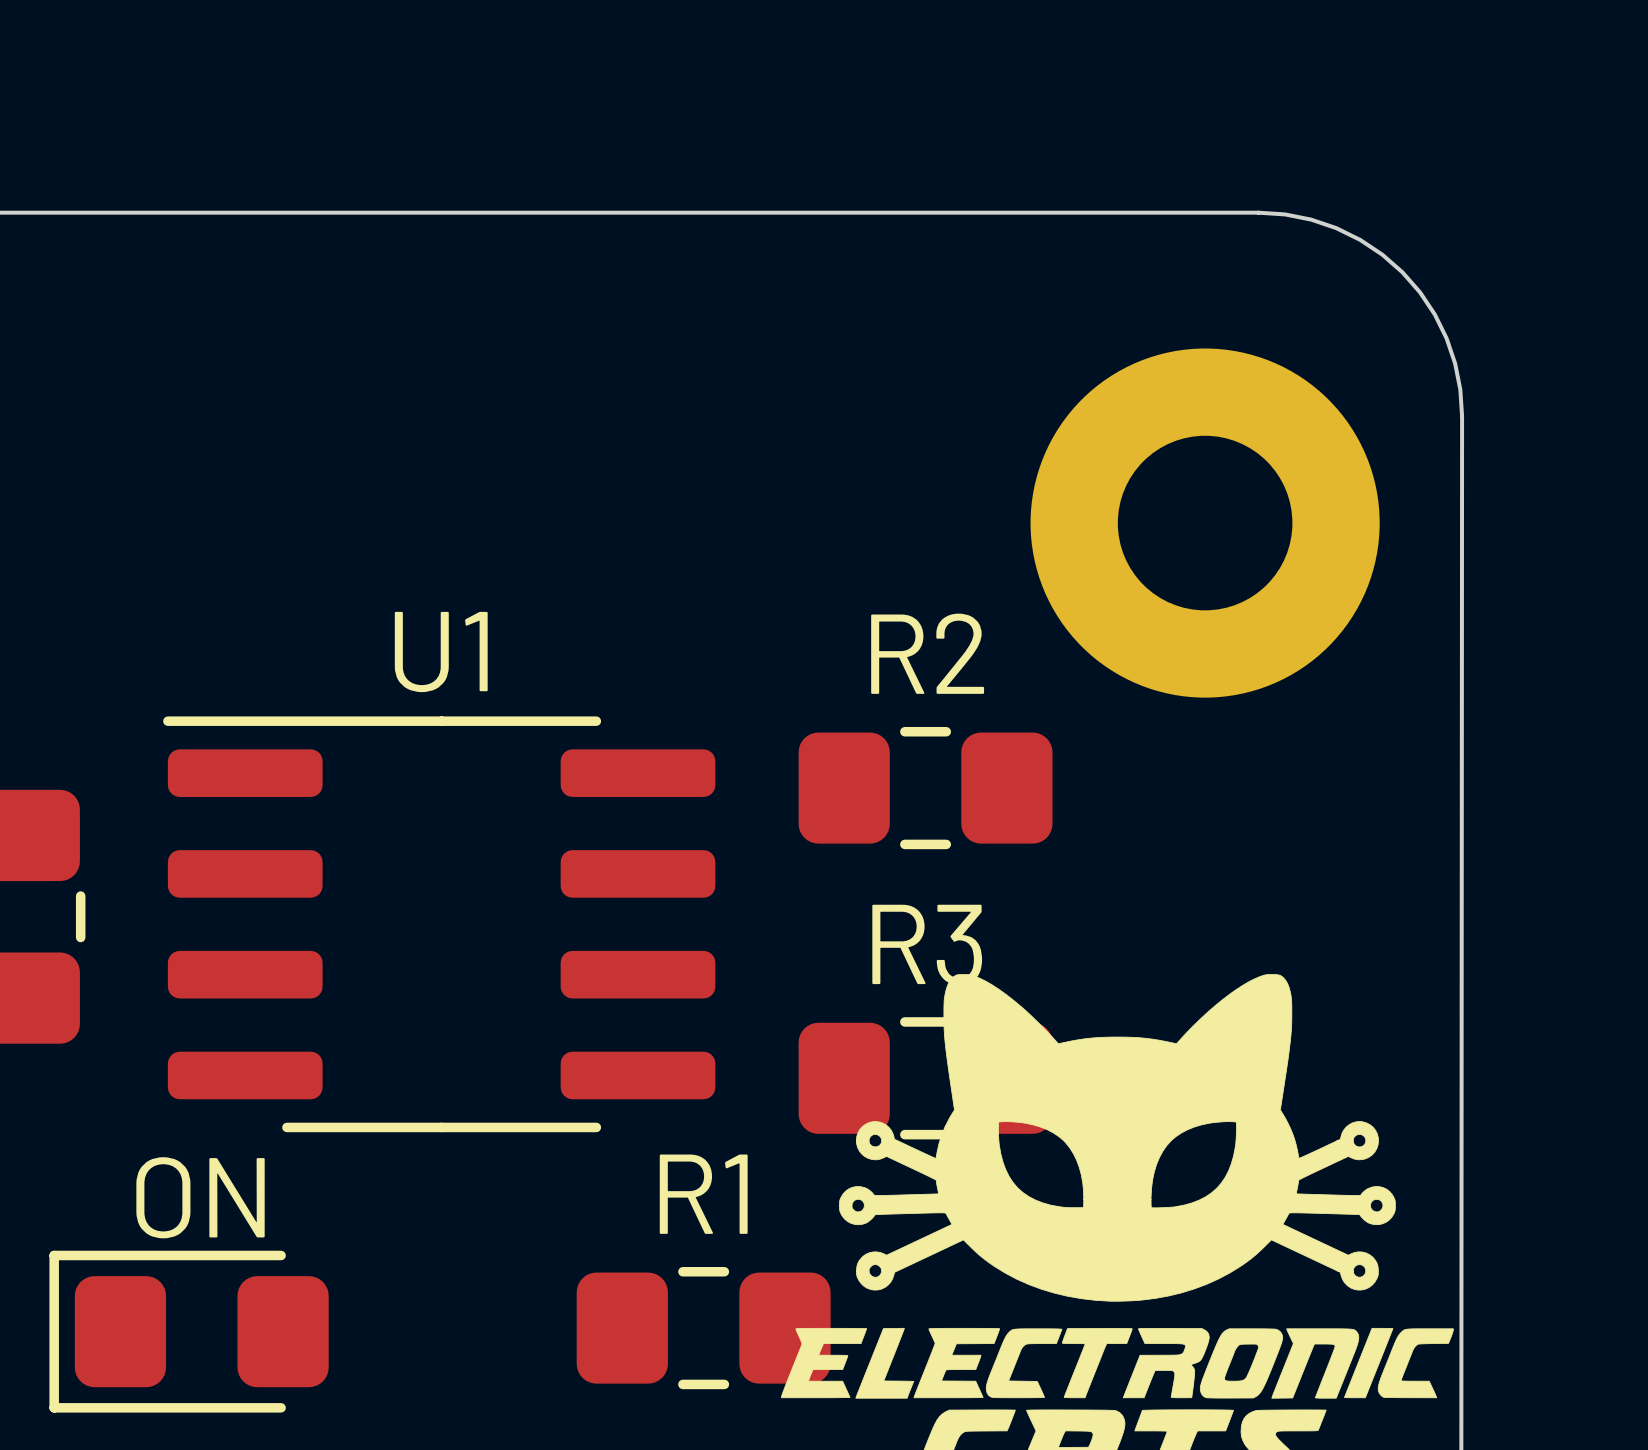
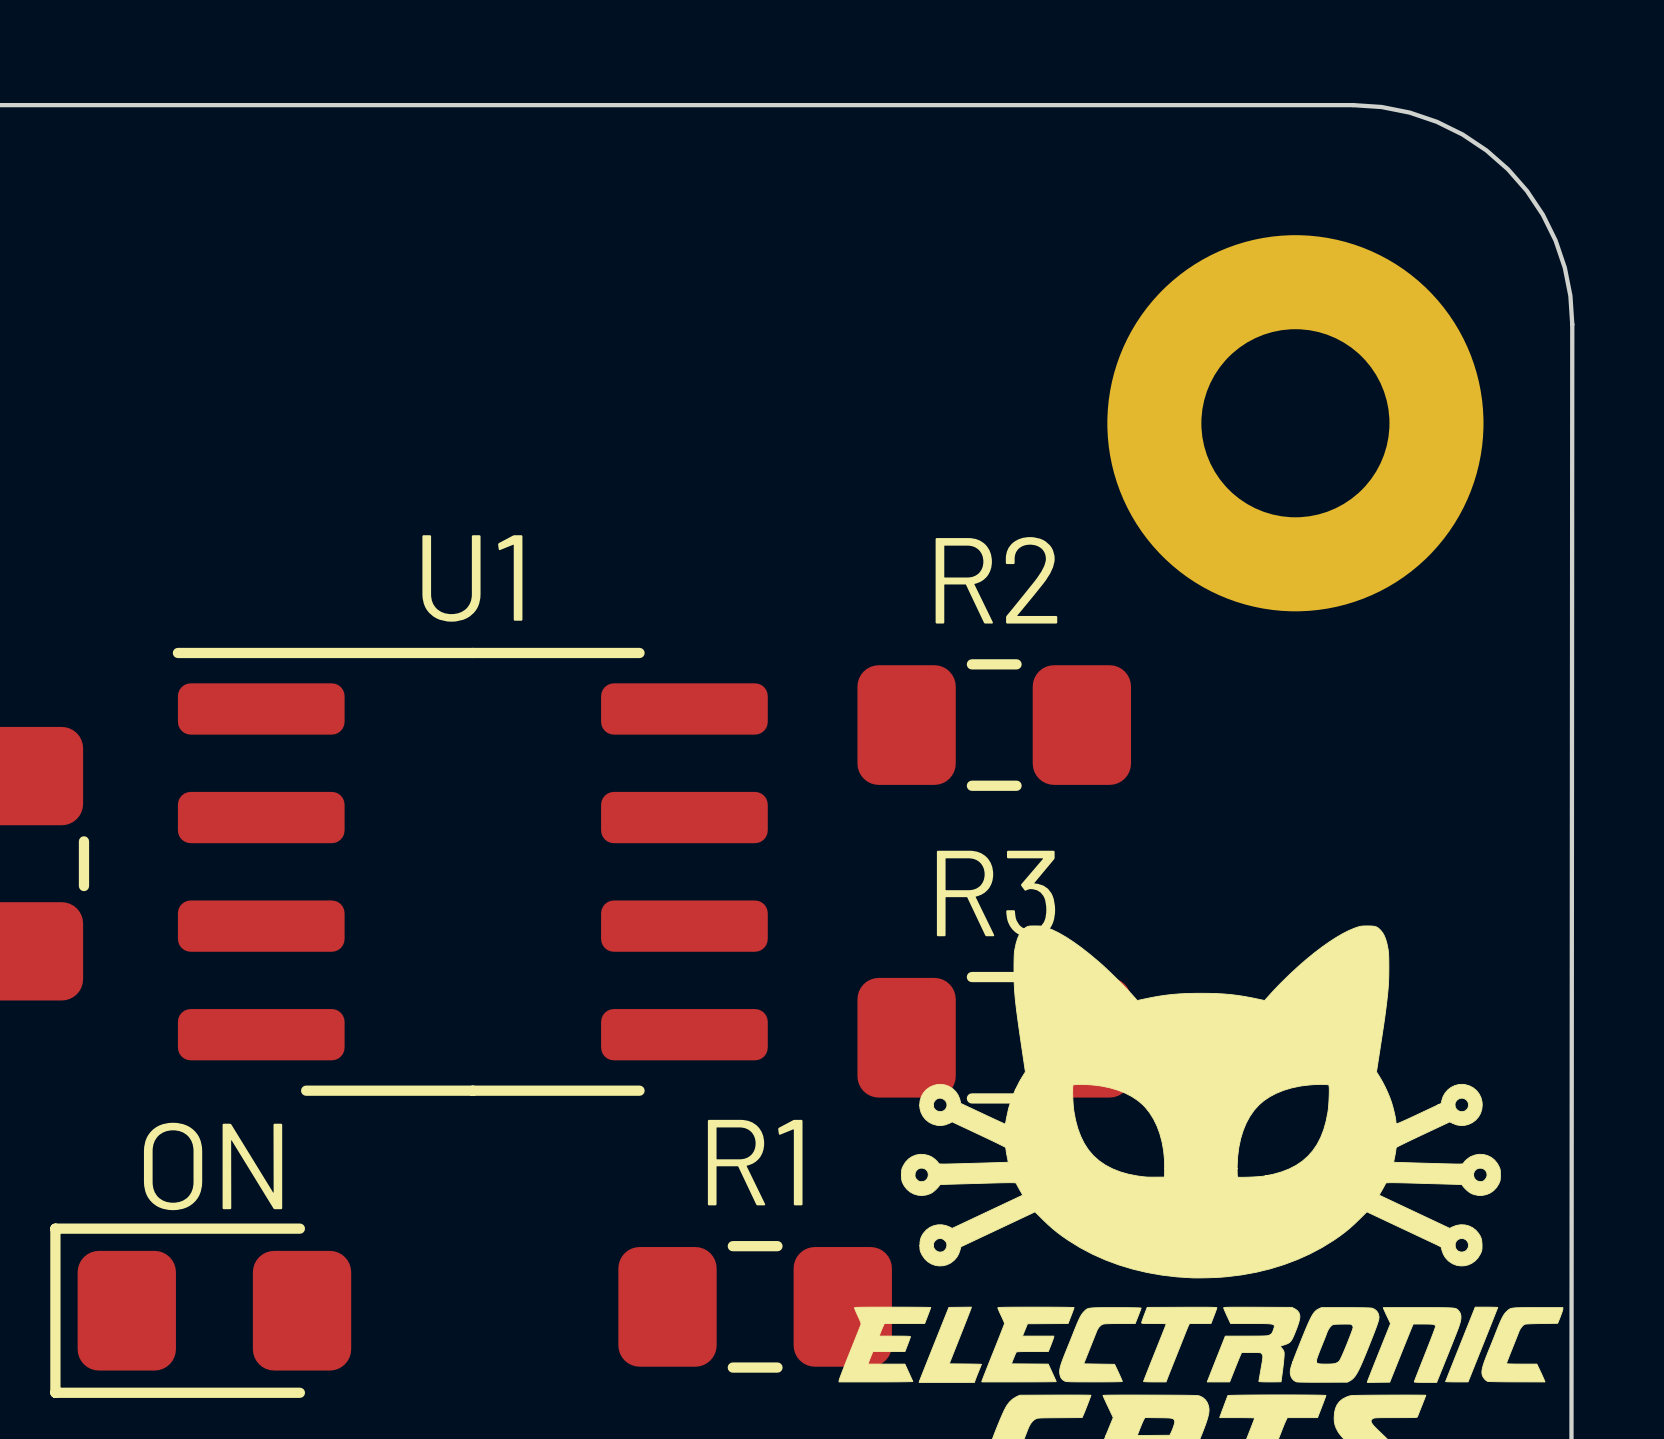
part position: (1205, 523) -> (1295, 423)

